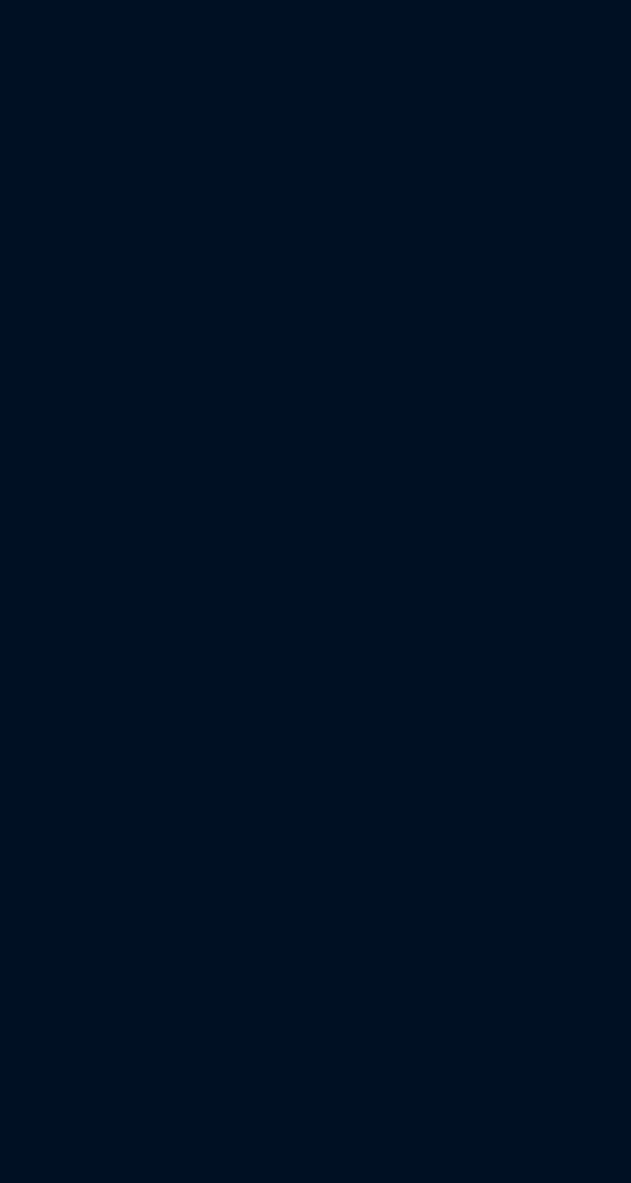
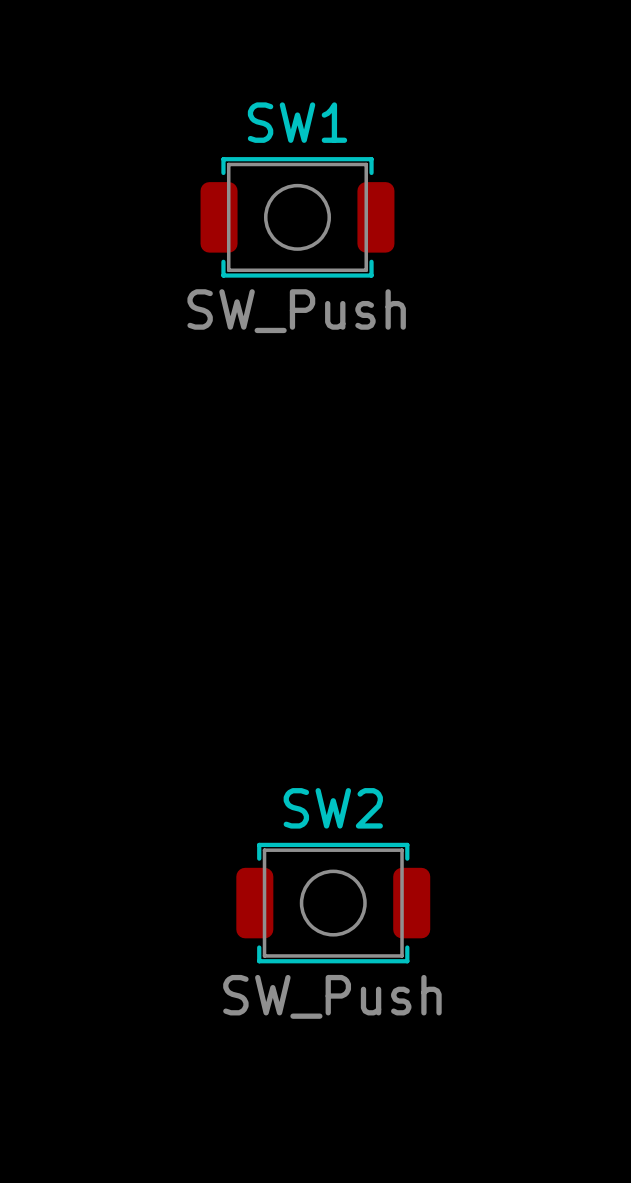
SW1: none -> SW_Push (297, 217)
SW2: none -> SW_Push (333, 903)

